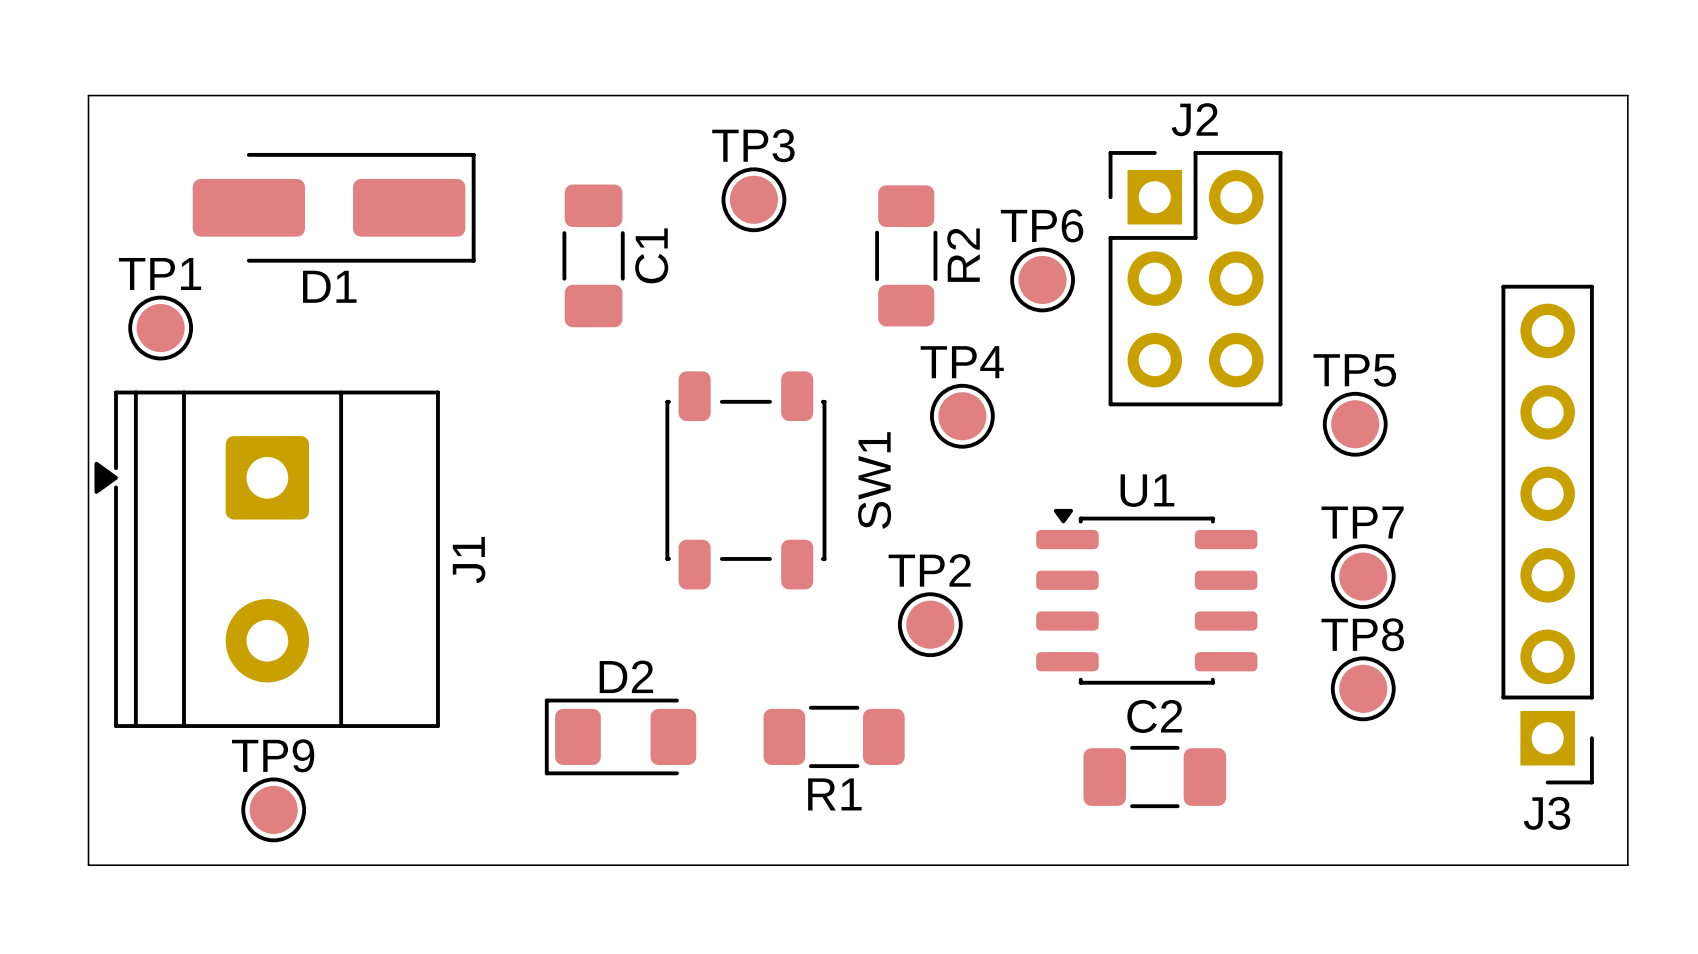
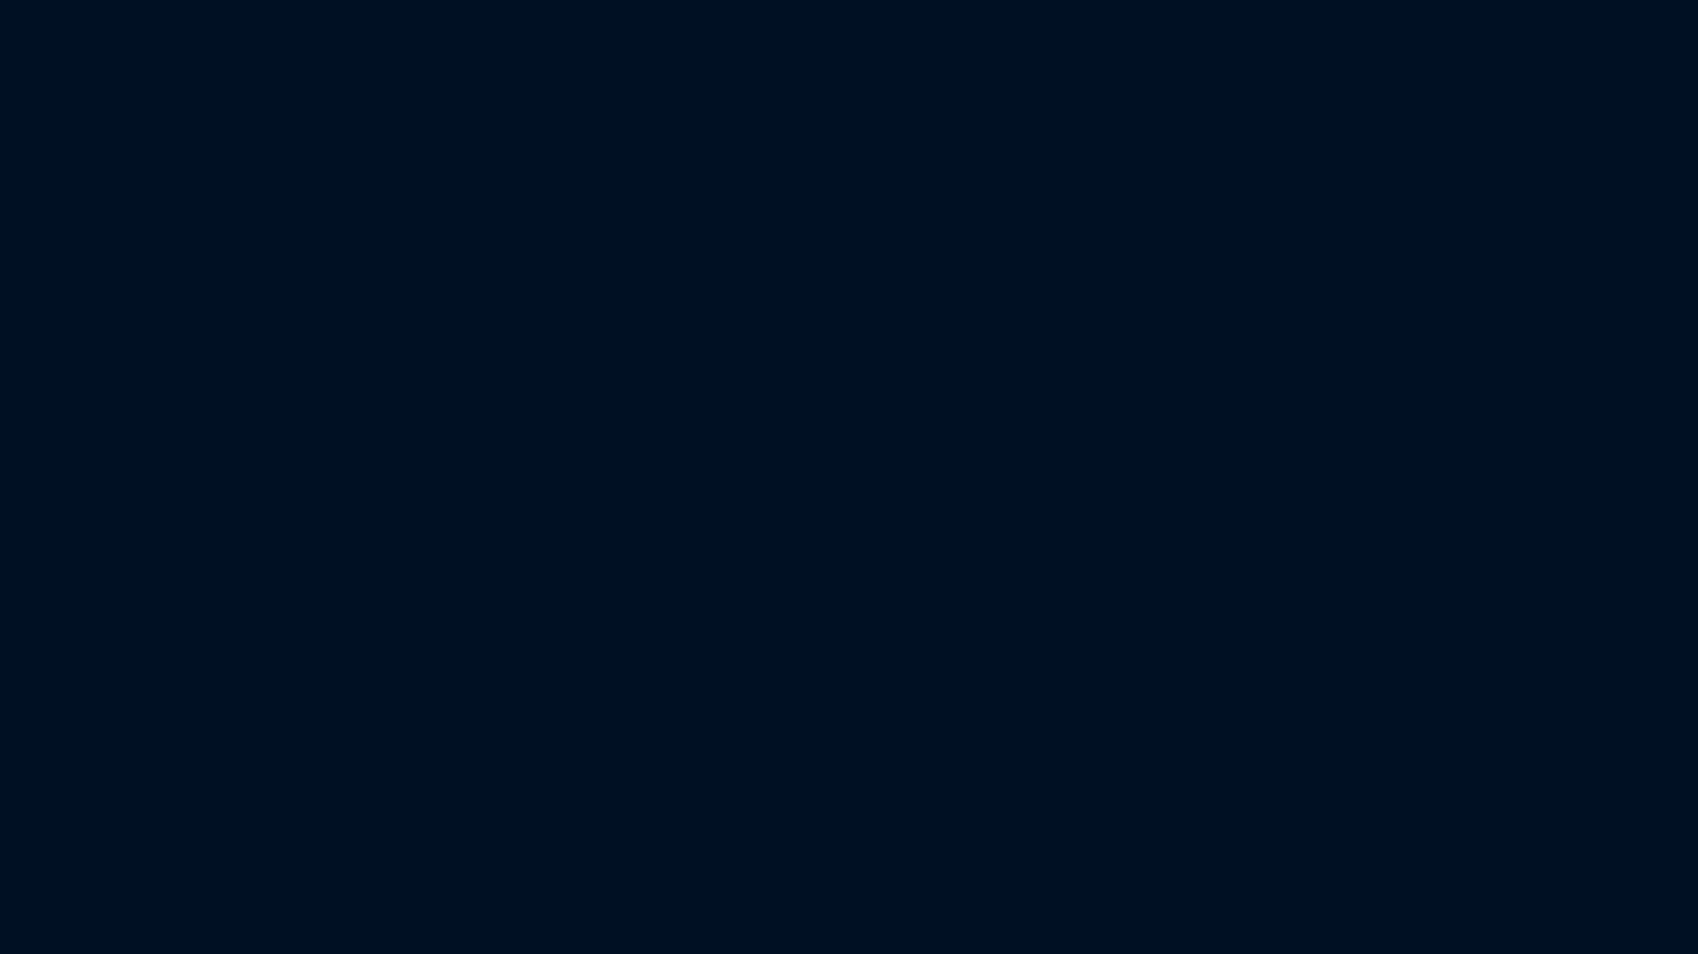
board edge: (88, 95) (1627, 95) (1627, 865) (88, 865) (88, 95) -> none
TP3: (753, 199) -> none
D1: (334, 207) -> none
C1: (593, 255) -> none
R2: (906, 255) -> none
J2: (1195, 278) -> none
TP6: (1042, 279) -> none
TP1: (160, 328) -> none
TP4: (962, 416) -> none
TP5: (1355, 424) -> none
SW1: (745, 480) -> none
J3: (1547, 534) -> none
J1: (267, 559) -> none
TP7: (1363, 576) -> none
U1: (1146, 596) -> none
TP2: (930, 624) -> none
TP8: (1363, 688) -> none
D2: (620, 736) -> none
R1: (834, 736) -> none
C2: (1154, 777) -> none
TP9: (273, 809) -> none

